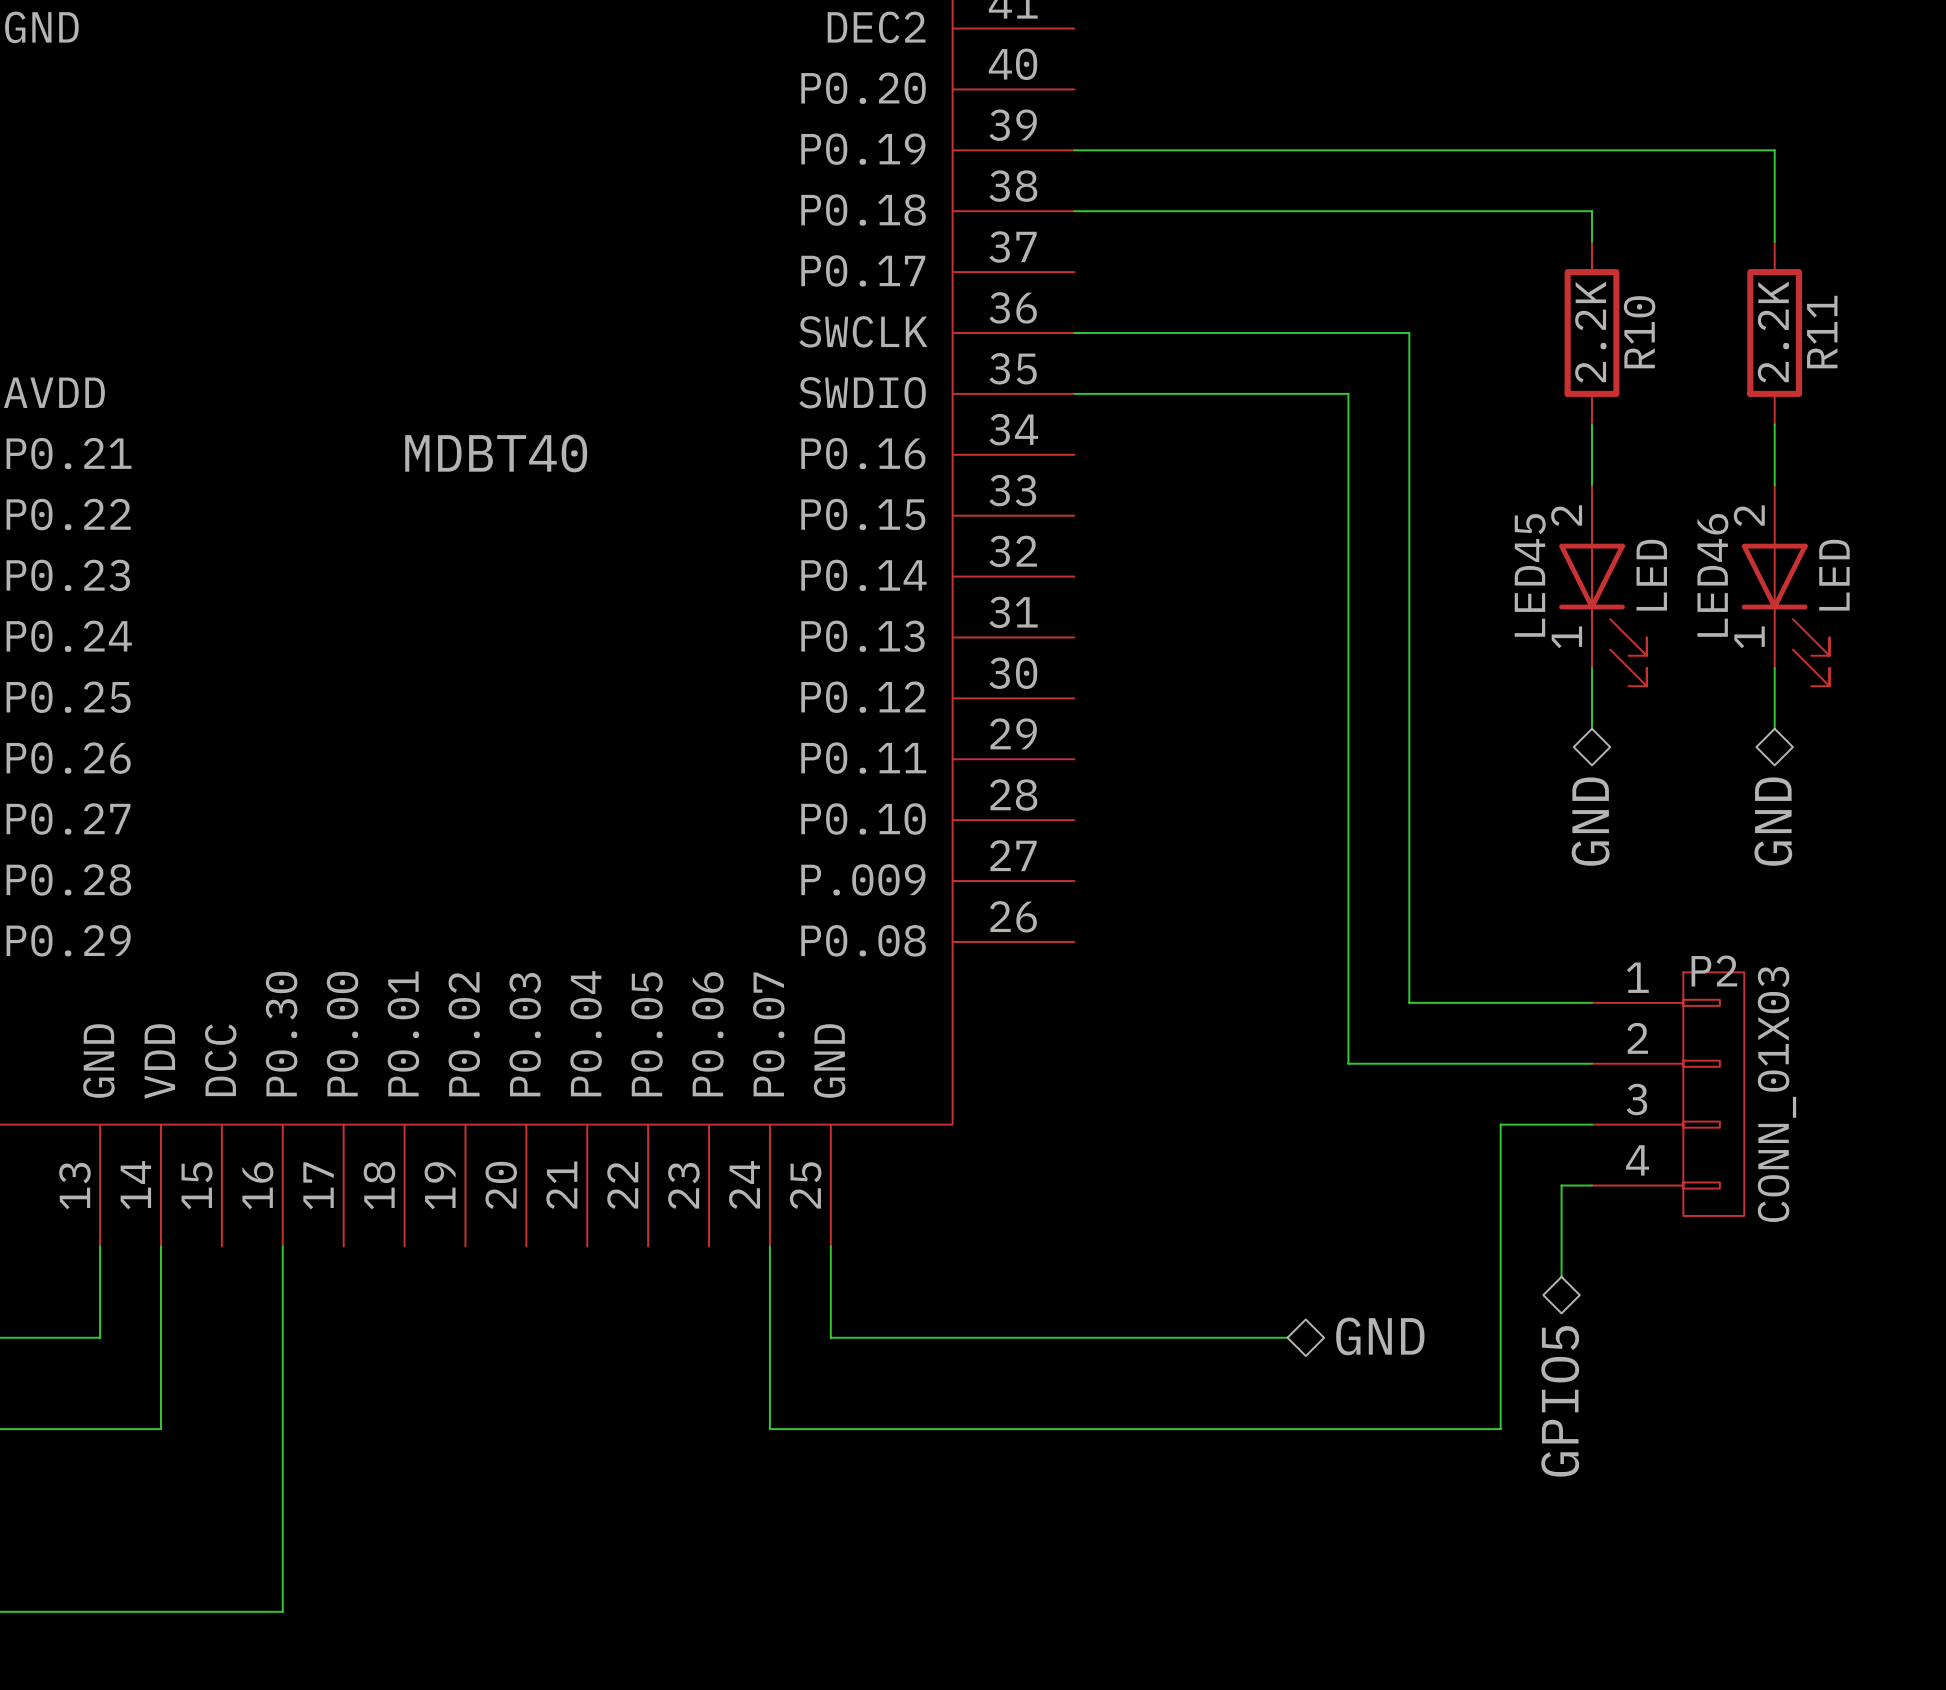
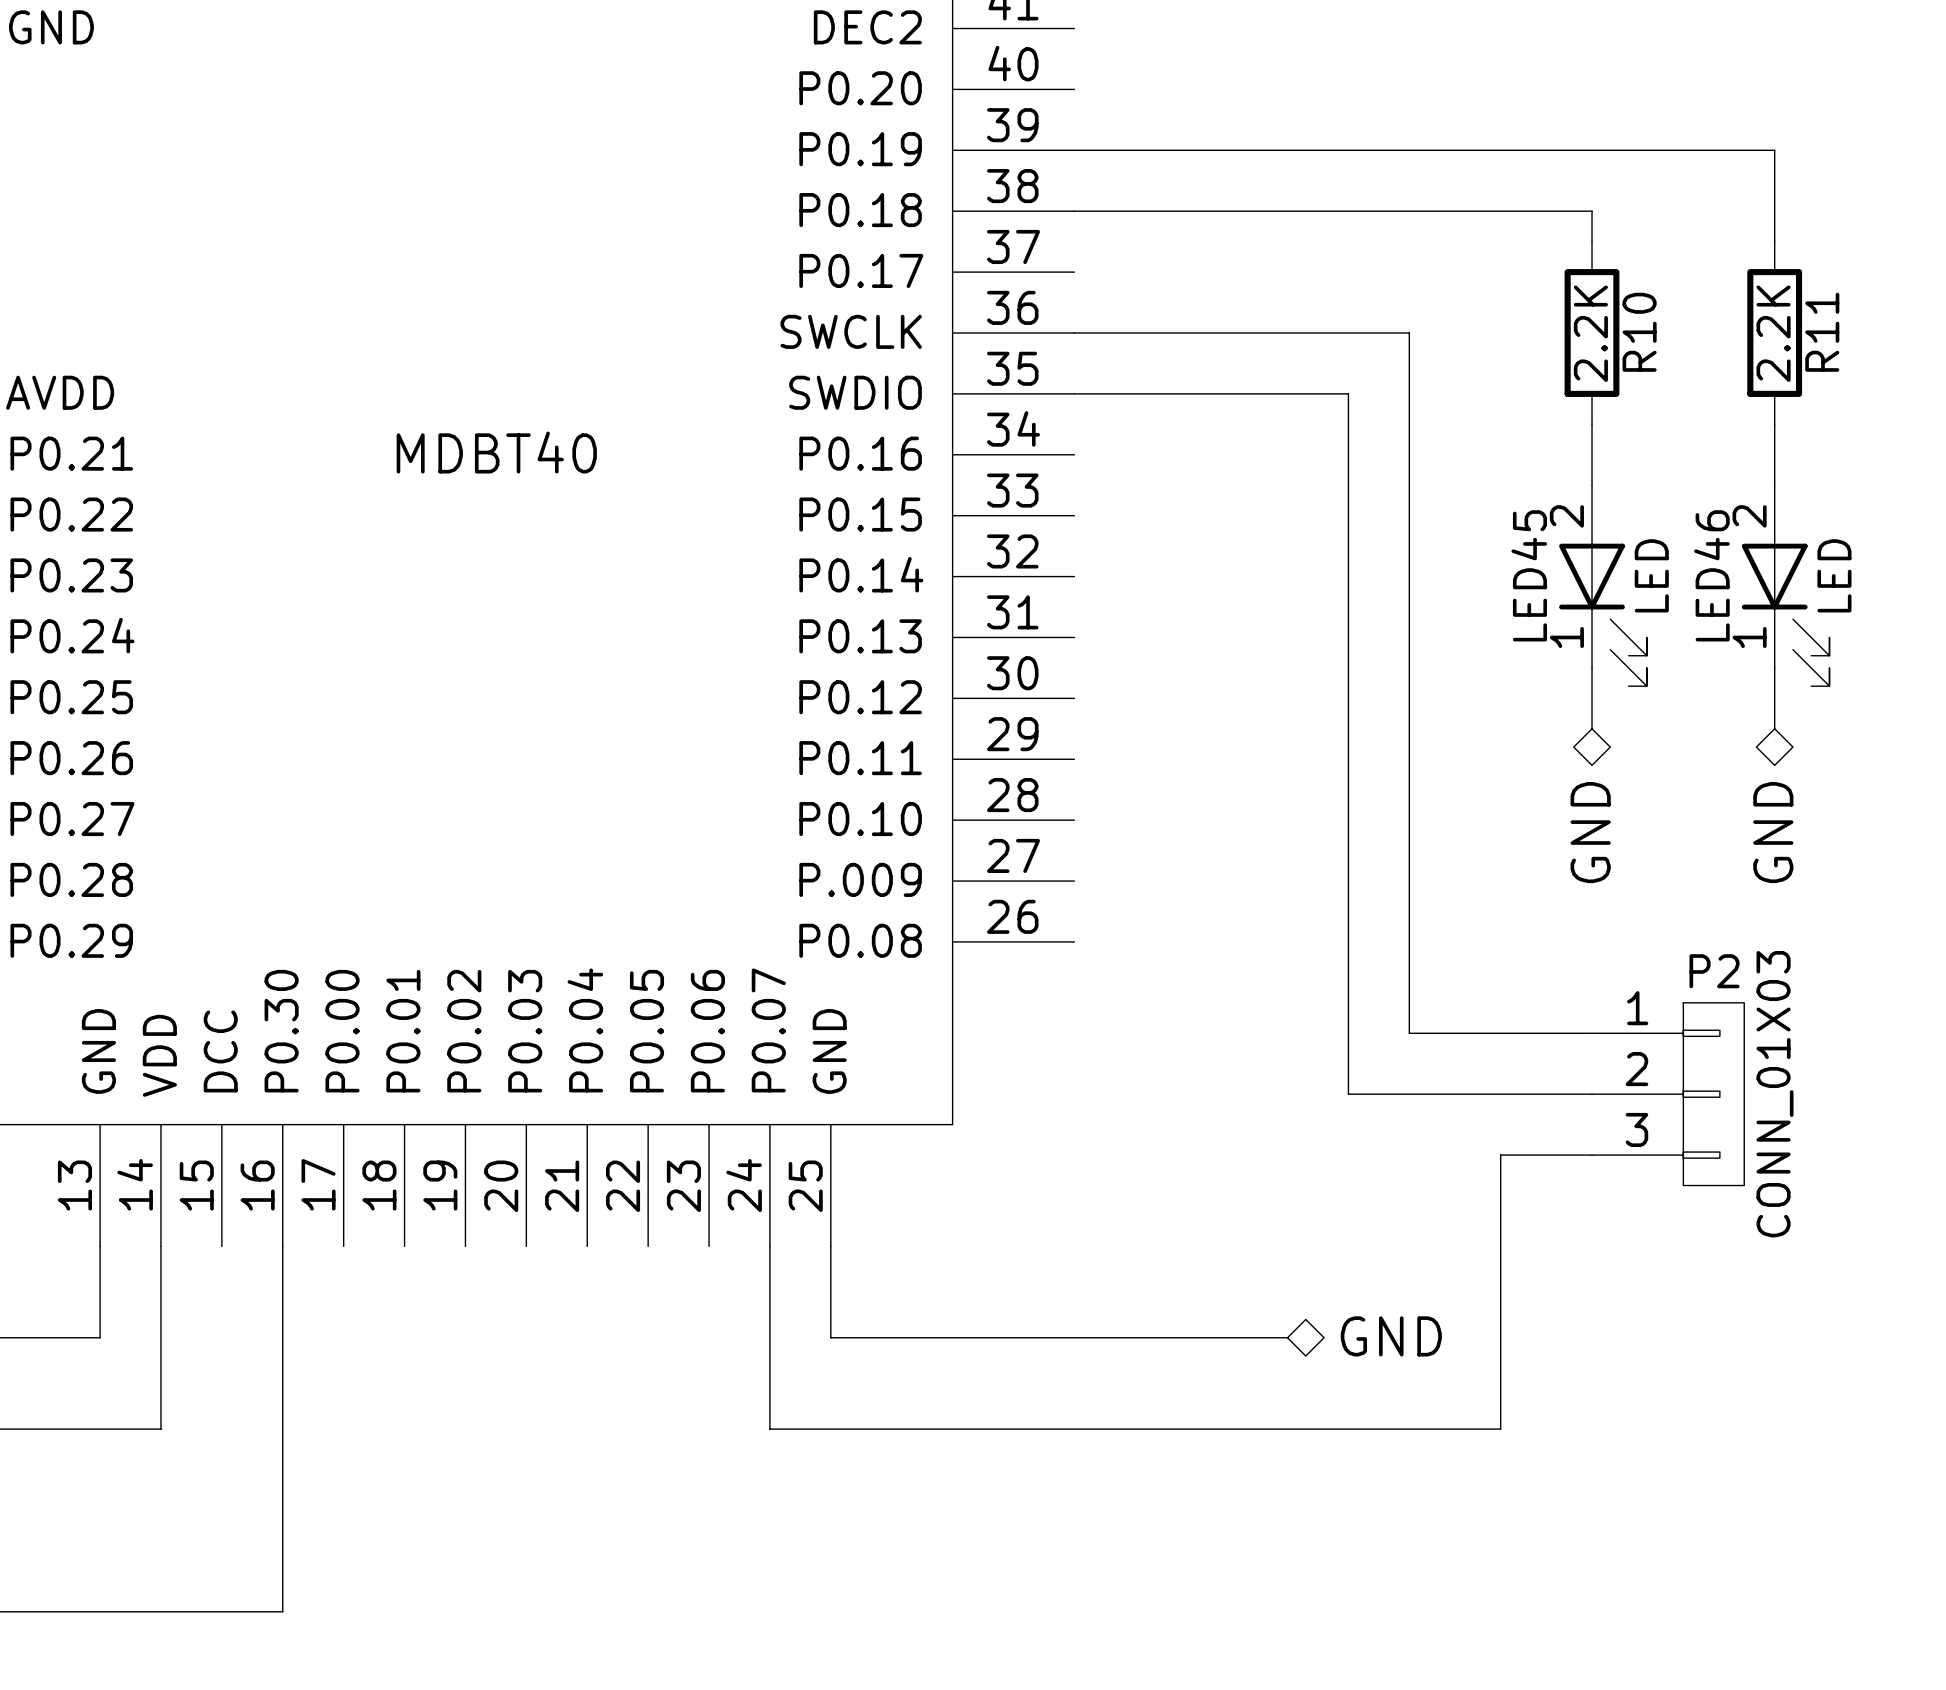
P2 symbol: [1592, 972, 1745, 1216] -> [1592, 1002, 1745, 1186]
wire: (1409, 1002) (1592, 1002) -> (1409, 1002) (1409, 1033) (1592, 1033)
wire: (1348, 1063) (1592, 1063) -> (1348, 1063) (1348, 1094) (1592, 1094)
wire: (1592, 1124) (1500, 1124) (1500, 1155) -> (1592, 1155) (1500, 1155)
wire: (1592, 1185) (1561, 1185) (1561, 1276) -> none
hierarchical label: GPIO5 (1560, 1401) -> none

